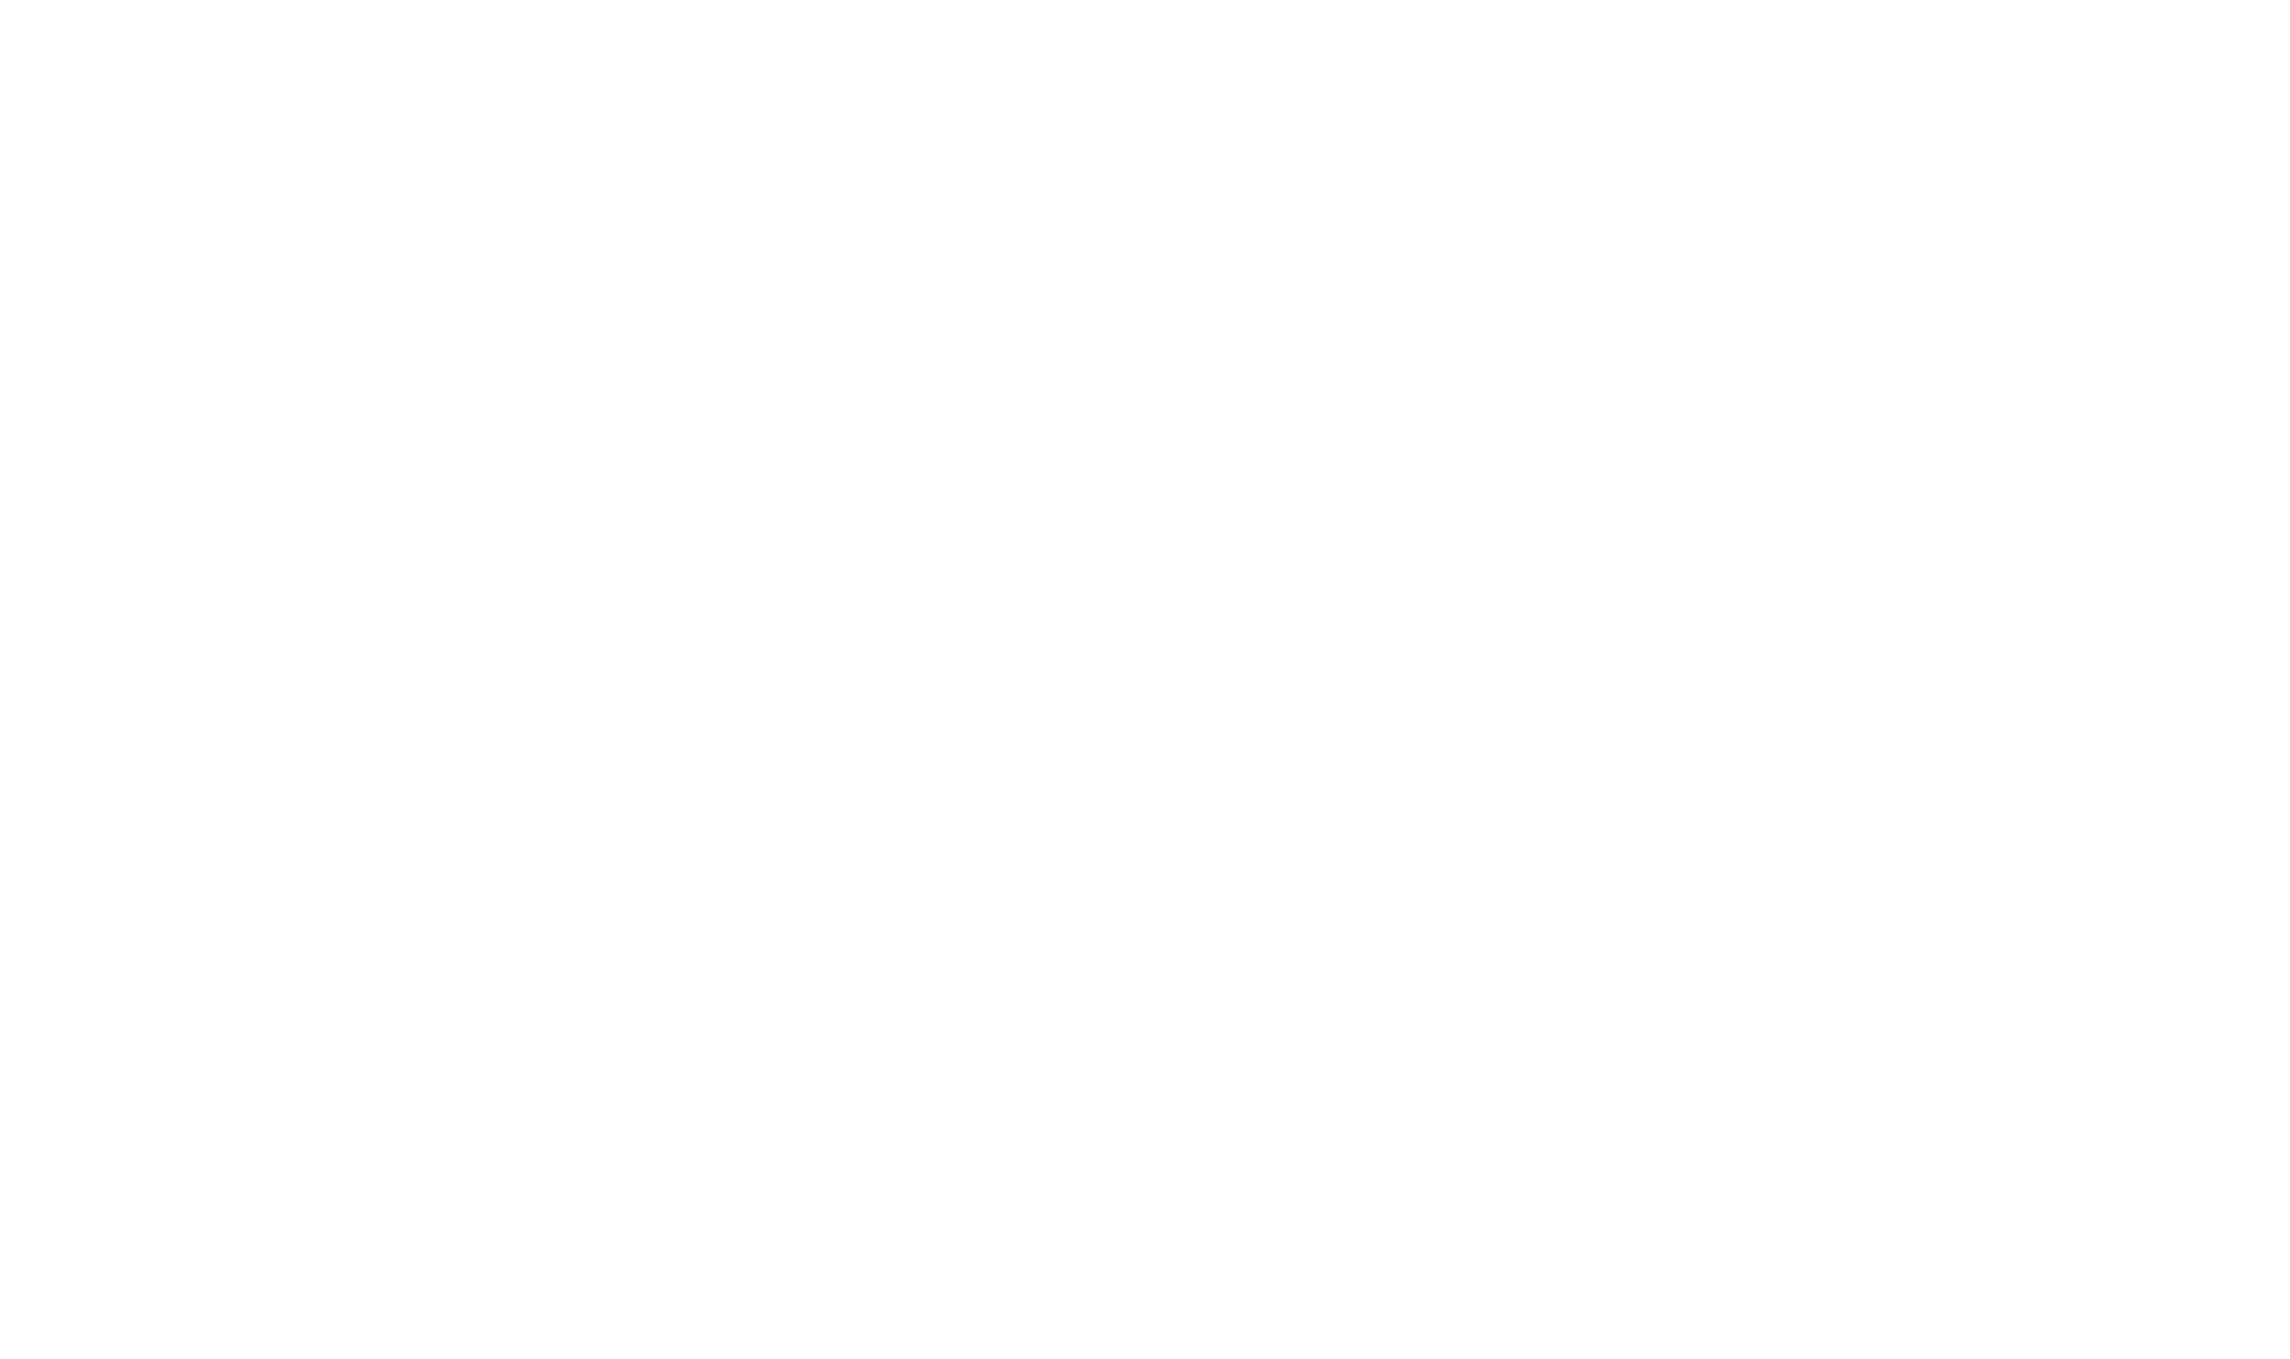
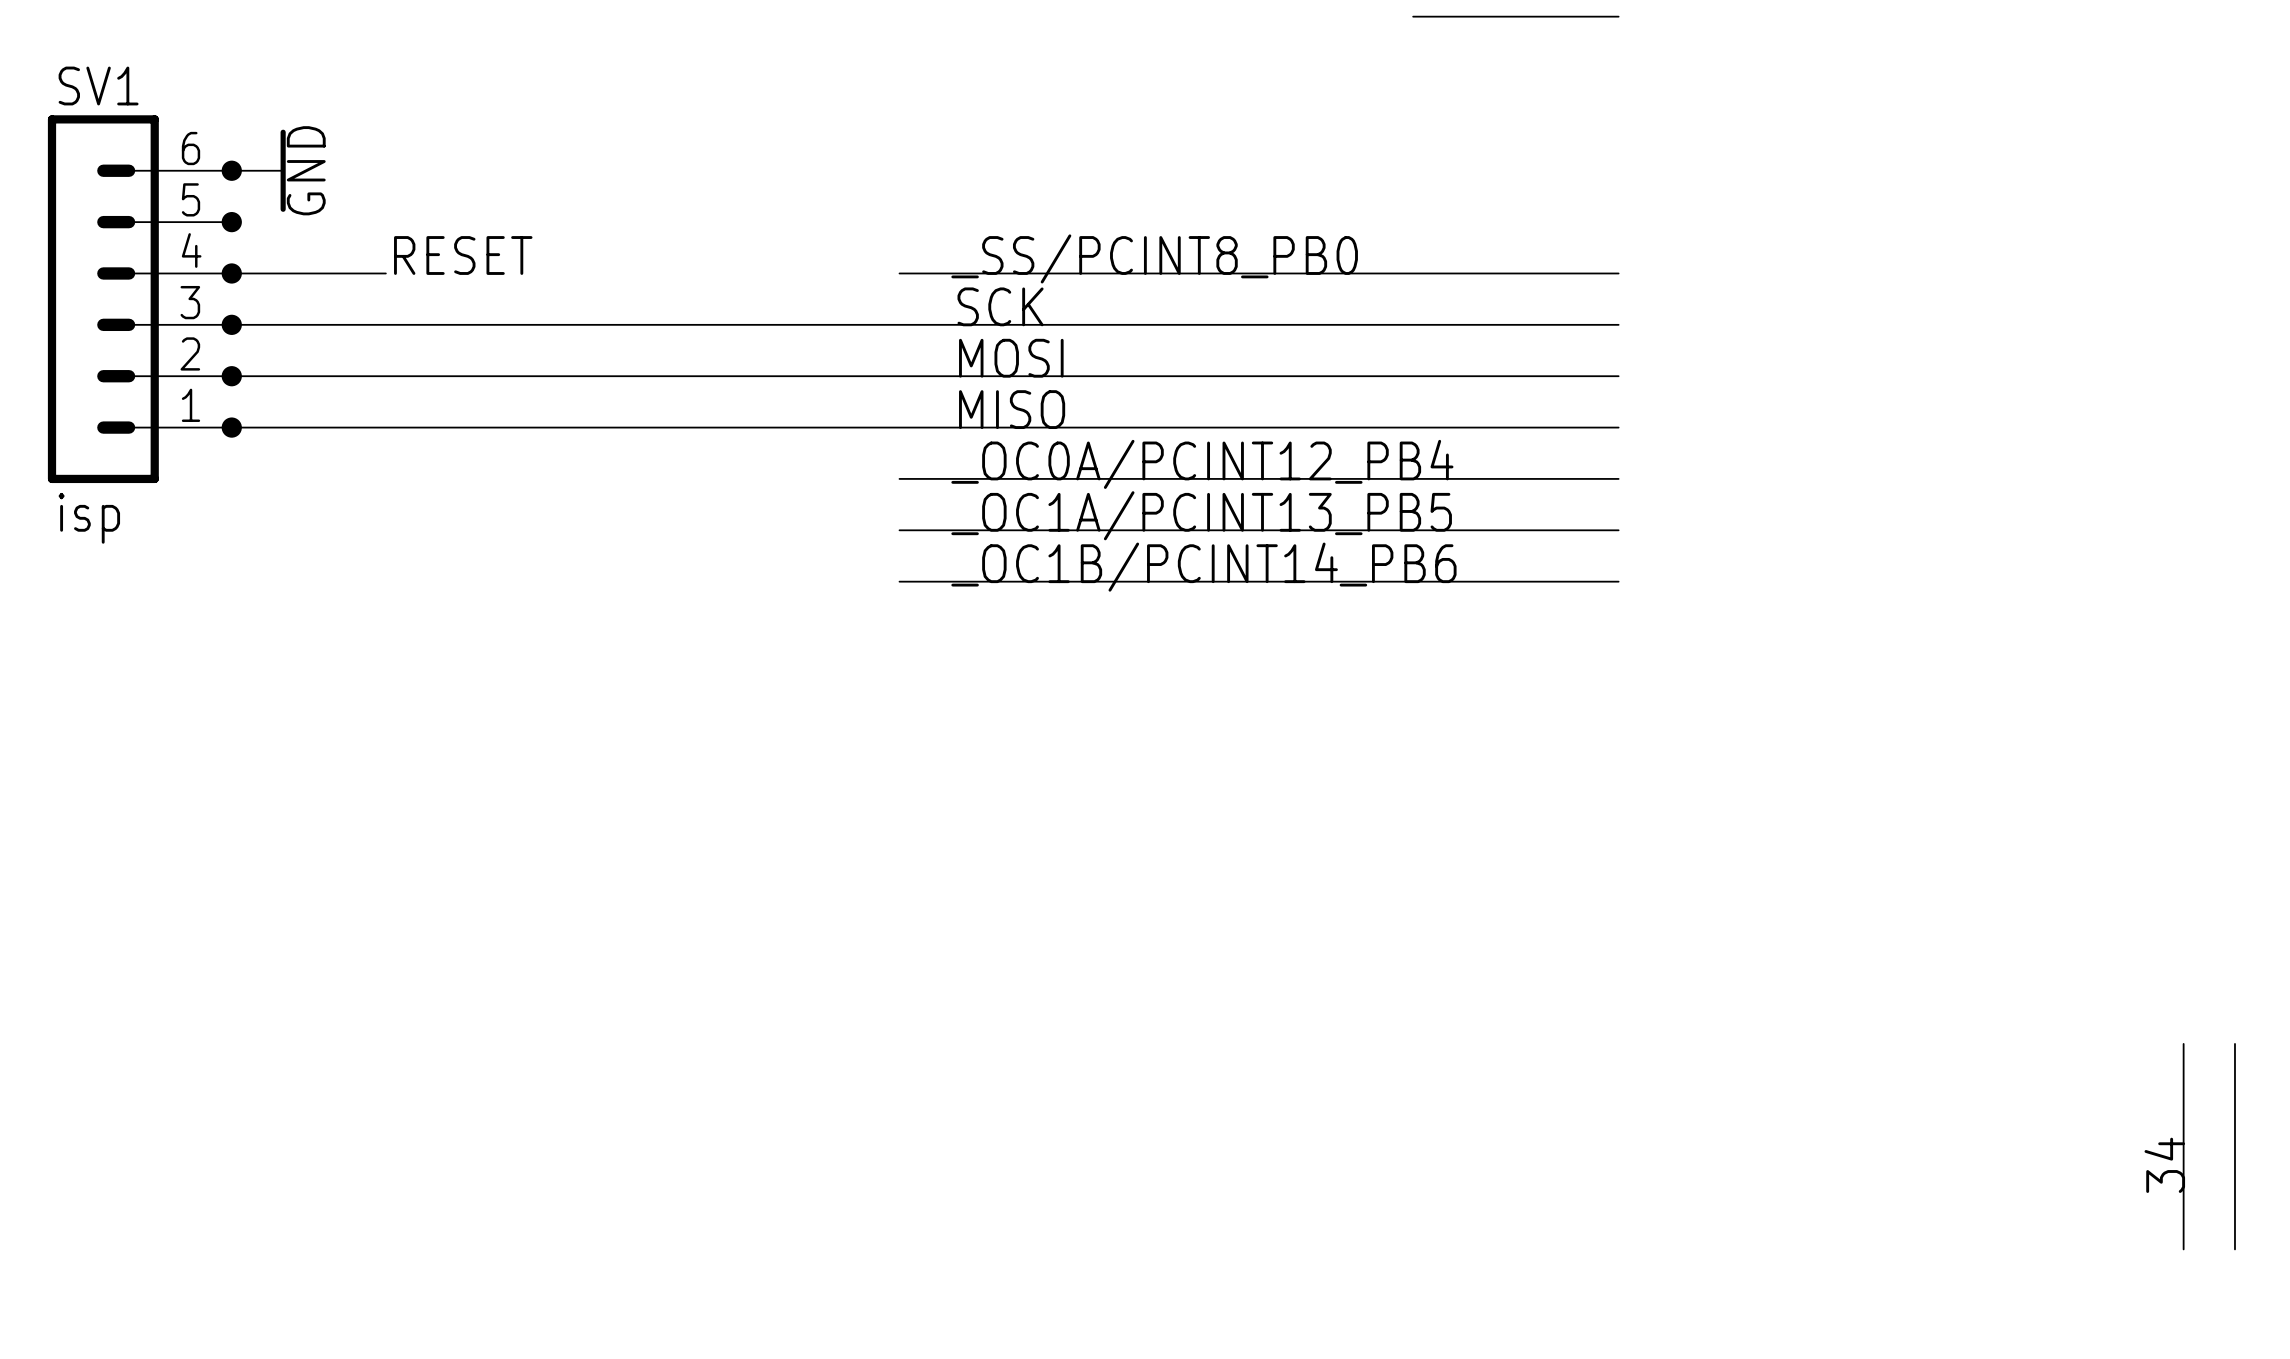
wire: none -> (1413, 16) (1618, 16)
junction: none -> (231, 170)
power symbol: none -> GND (258, 170)
junction: none -> (231, 222)
label: none -> RESET (463, 255)
label: none -> _SS/PCINT8_PB0 (1154, 258)
wire: none -> (231, 273) (385, 273)
junction: none -> (231, 273)
wire: none -> (899, 273) (1618, 273)
SV1: none -> isp (139, 299)
label: none -> SCK (1000, 306)
wire: none -> (231, 324) (1618, 324)
junction: none -> (231, 324)
label: none -> MOSI (1011, 358)
wire: none -> (231, 376) (1618, 376)
junction: none -> (231, 376)
label: none -> MISO (1012, 409)
wire: none -> (231, 427) (1618, 427)
junction: none -> (231, 427)
label: none -> _OC0A/PCINT12_PB4 (1202, 464)
wire: none -> (899, 478) (1618, 478)
label: none -> _OC1A/PCINT13_PB5 (1201, 515)
wire: none -> (899, 530) (1618, 530)
label: none -> _OC1B/PCINT14_PB6 (1203, 567)
wire: none -> (899, 581) (1618, 581)
wire: none -> (2183, 1043) (2183, 1249)
wire: none -> (2234, 1043) (2234, 1249)
label: none -> 34 (2164, 1165)

